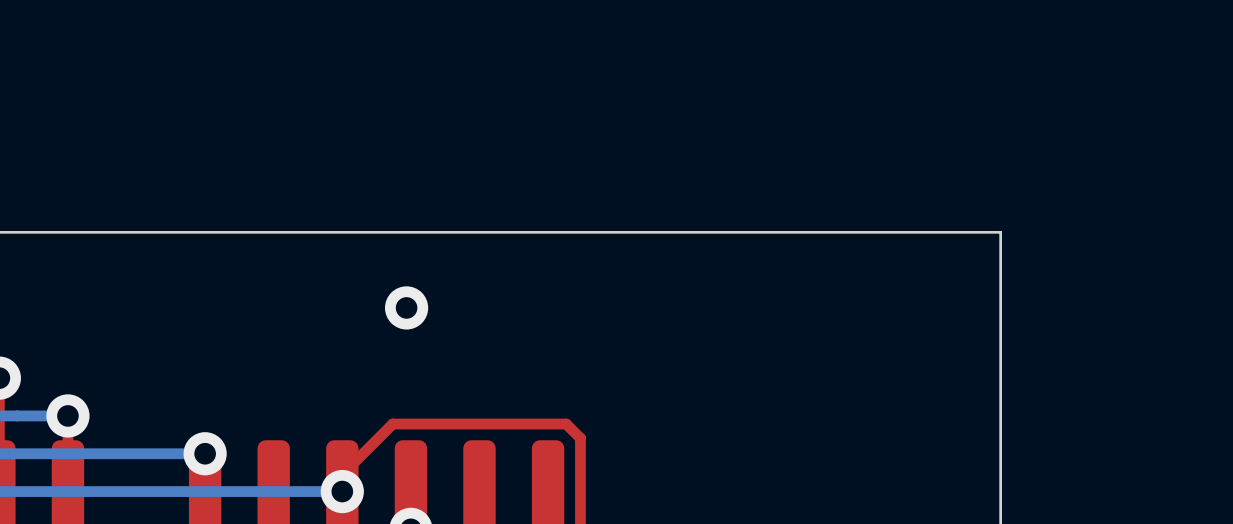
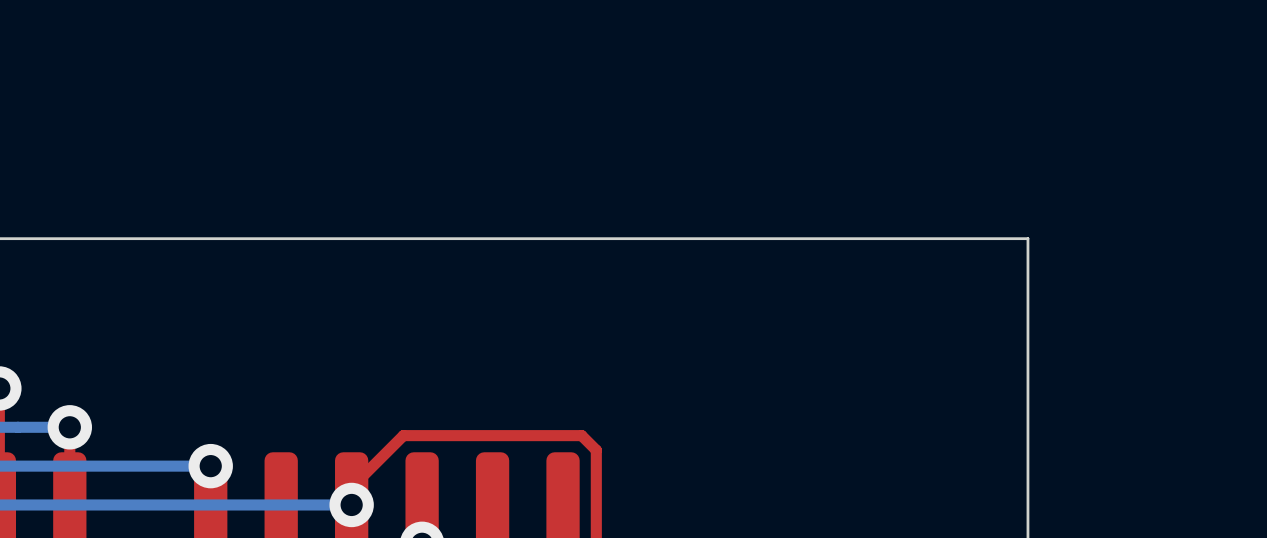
via: (406, 307) -> none

